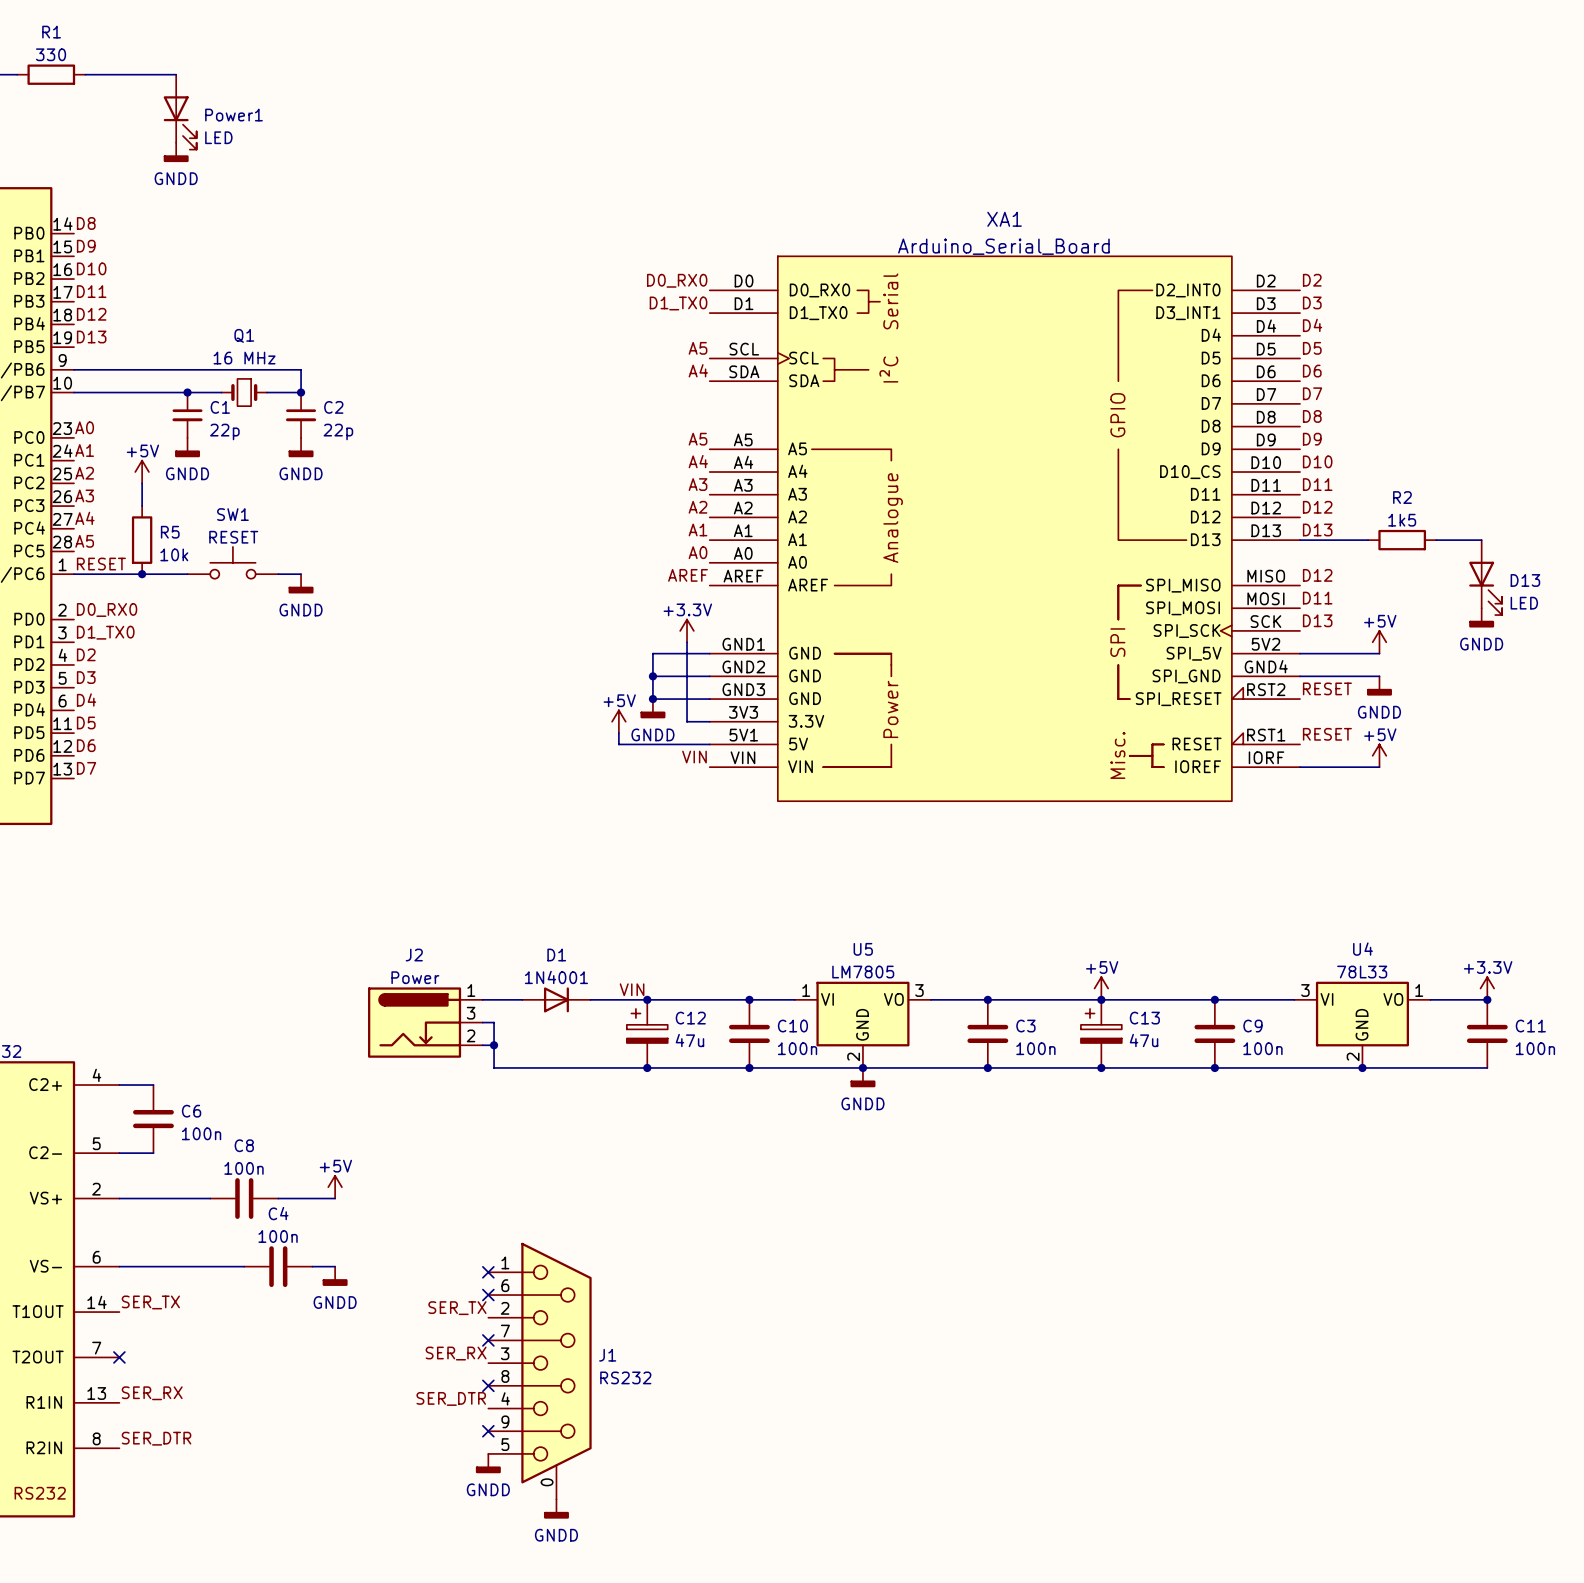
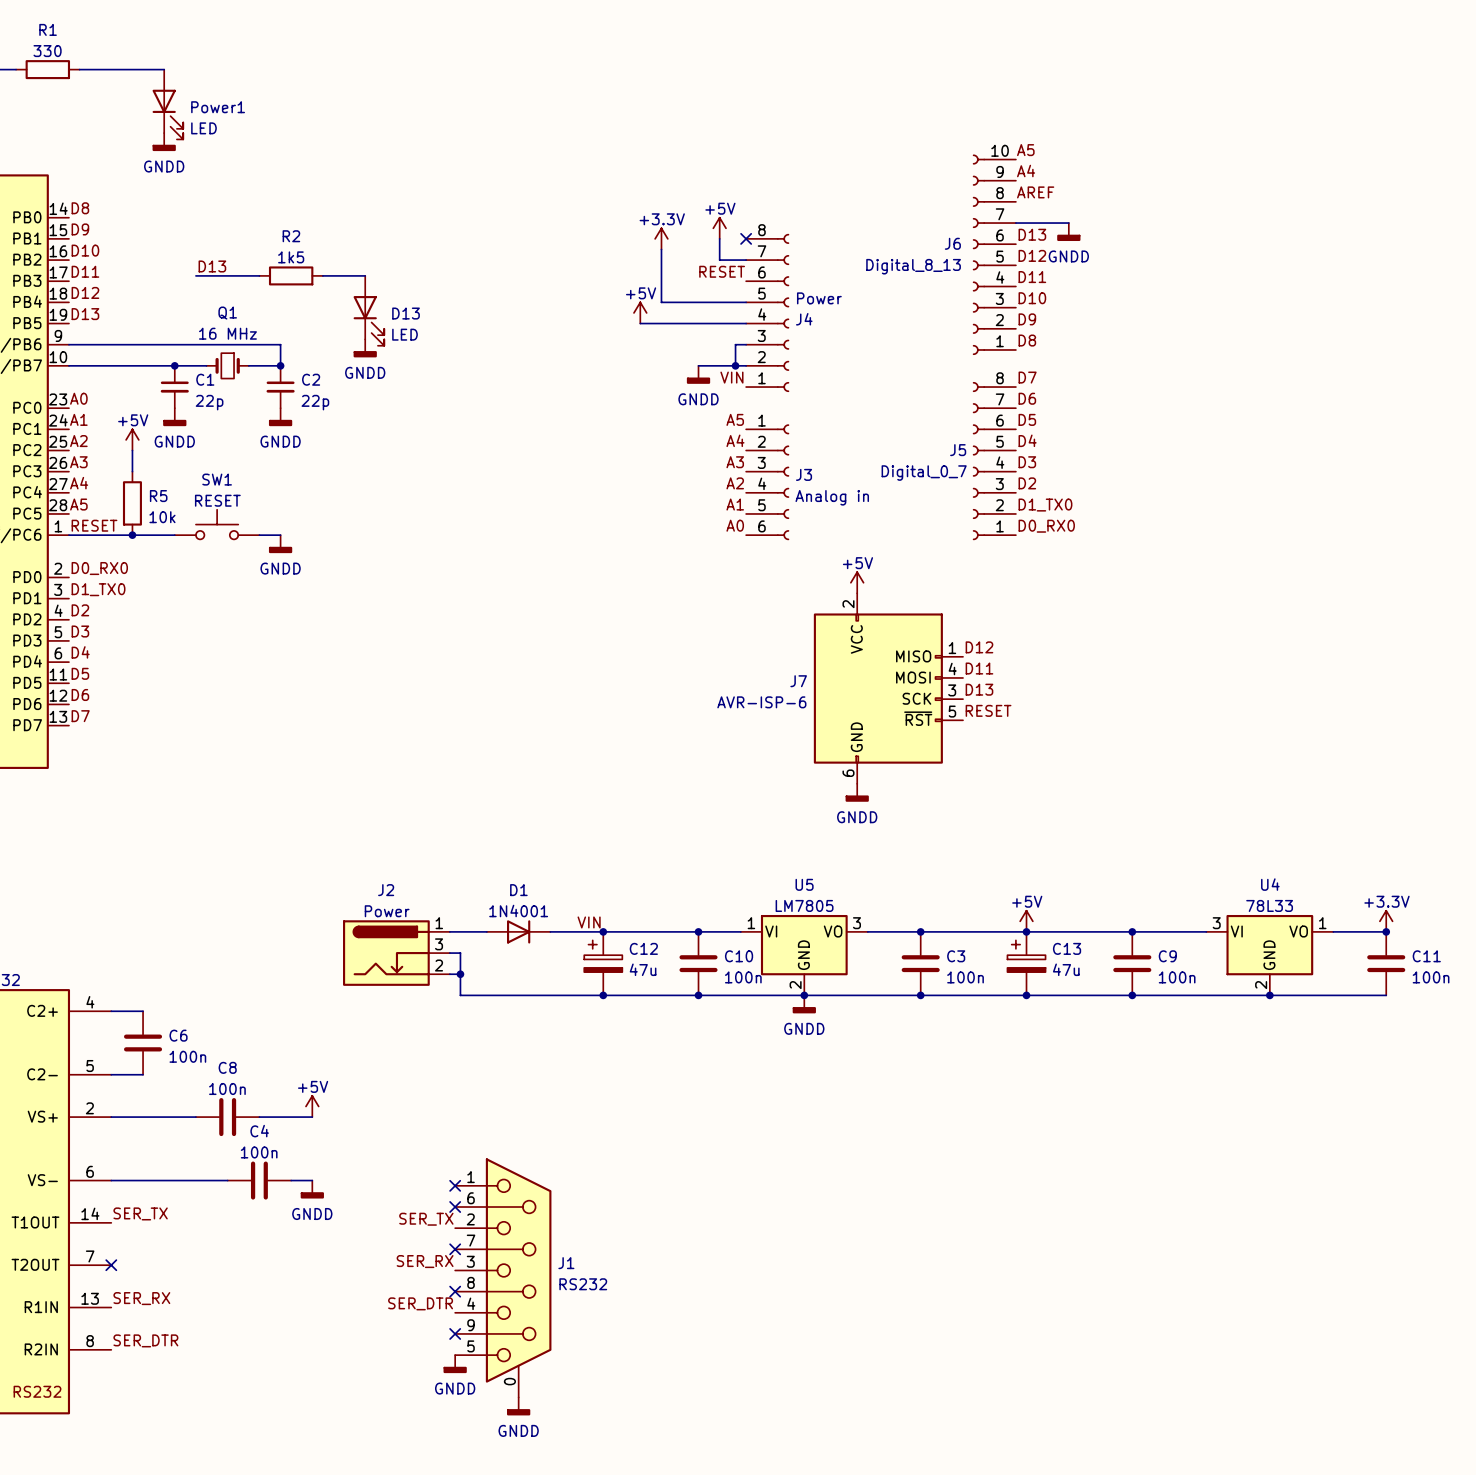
label: none -> A5 (1025, 150)
label: none -> A4 (1026, 171)
label: none -> AREF (1035, 192)
wire: none -> (1015, 223) (1068, 223)
power symbol: none -> +5V (719, 228)
power symbol: none -> GNDD (1068, 232)
label: none -> D13 (1032, 234)
power symbol: none -> +3.3V (661, 238)
wire: none -> (719, 238) (719, 260) (746, 260)
no-connect mark: none -> (746, 238)
wire: none -> (661, 249) (661, 302) (746, 302)
J6: none -> Digital_8_13 (994, 254)
label: none -> D12 (1032, 255)
label: D0_RX0 (677, 280) -> none
label: D2 (1312, 280) -> none
label: none -> D13 (212, 266)
label: none -> RESET (722, 271)
wire: none -> (195, 275) (259, 275)
wire: none -> (322, 275) (365, 275)
label: none -> D11 (1032, 277)
label: D3 (1312, 302) -> none
label: D1_TX0 (678, 303) -> none
label: none -> D10 (1032, 298)
label: D4 (1312, 325) -> none
power symbol: none -> +5V (640, 312)
J4: none -> Power (767, 312)
label: none -> D9 (1027, 319)
wire: none -> (640, 323) (746, 323)
label: A5 (698, 348) -> none
label: D5 (1312, 348) -> none
label: A4 (698, 370) -> none
label position: D6 (1312, 371) -> D6 (1027, 398)
power symbol: none -> GNDD (365, 348)
wire: none -> (698, 365) (746, 365)
junction: none -> (735, 365)
label position: D7 (1312, 393) -> D7 (1027, 377)
power symbol: none -> GNDD (698, 374)
label: none -> VIN (731, 377)
label position: D8 (1312, 416) -> D8 (1027, 340)
label: A5 (698, 439) -> none
label: D9 (1312, 439) -> none
label: none -> A5 (735, 419)
label: none -> D5 (1027, 419)
label: A4 (698, 461) -> none
label: D10 (1317, 461) -> none
label: none -> A4 (735, 440)
label: none -> D4 (1027, 440)
label position: A3 (698, 484) -> A3 (735, 462)
label: D11 (1317, 484) -> none
J5: none -> Digital_0_7 (994, 461)
label: none -> D3 (1027, 462)
label position: A2 (698, 507) -> A2 (735, 483)
label: D12 (1317, 507) -> none
J3: none -> Analog in (767, 482)
label: none -> D2 (1027, 483)
XA1: Arduino_Serial_Board (1004, 528) -> none
label position: A1 (698, 529) -> A1 (735, 504)
label: D13 (1317, 529) -> none
wire: (1300, 540) (1368, 540) -> none
R2 position: (1402, 540) -> (291, 275)
wire: (1436, 540) (1481, 540) -> none
label: none -> D1_TX0 (1045, 505)
label position: A0 (698, 552) -> A0 (735, 525)
label: none -> D0_RX0 (1046, 526)
label: AREF (688, 575) -> none
label: D12 (1317, 575) -> none
D13 position: (1485, 577) -> (368, 310)
label: D11 (1317, 598) -> none
power symbol: GNDD (1481, 617) -> none
label: D13 (1317, 620) -> none
power symbol: none -> +5V (857, 582)
power symbol: +3.3V (687, 630) -> none
wire: (687, 642) (687, 721) (709, 721) -> none
power symbol: +5V (1379, 642) -> none
wire: (709, 653) (652, 653) (652, 699) (709, 699) -> none
wire: (1300, 653) (1379, 653) -> none
wire: (652, 676) (709, 676) -> none
junction: (652, 676) -> none
wire: (1300, 676) (1379, 676) -> none
power symbol: GNDD (1379, 685) -> none
label: RESET (1327, 688) -> none
label: none -> D12 (979, 647)
junction: (652, 699) -> none
power symbol: GNDD (652, 708) -> none
label: none -> D11 (979, 668)
power symbol: +5V (618, 721) -> none
wire: (618, 733) (618, 744) (709, 744) -> none
label: RESET (1327, 734) -> none
J7: none -> AVR-ISP-6 (888, 688)
label: none -> D13 (979, 689)
power symbol: +5V (1379, 755) -> none
label: VIN (694, 757) -> none
label: none -> RESET (988, 710)
wire: (1300, 767) (1379, 767) -> none
power symbol: none -> GNDD (857, 792)

